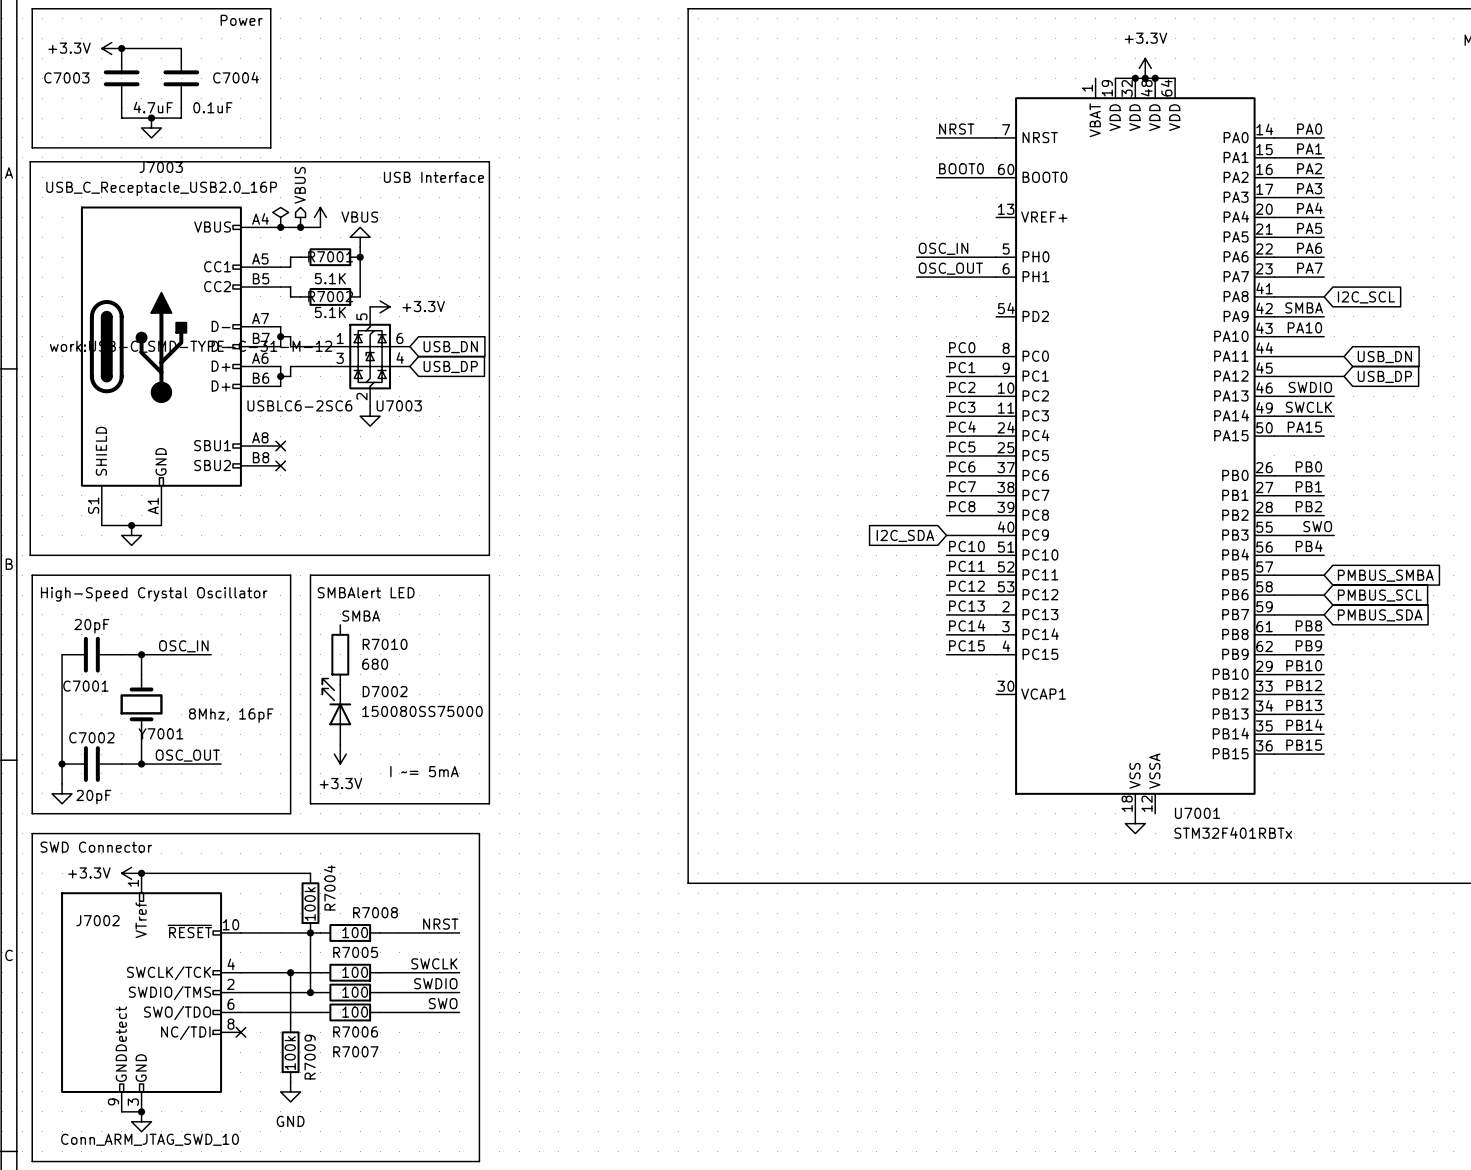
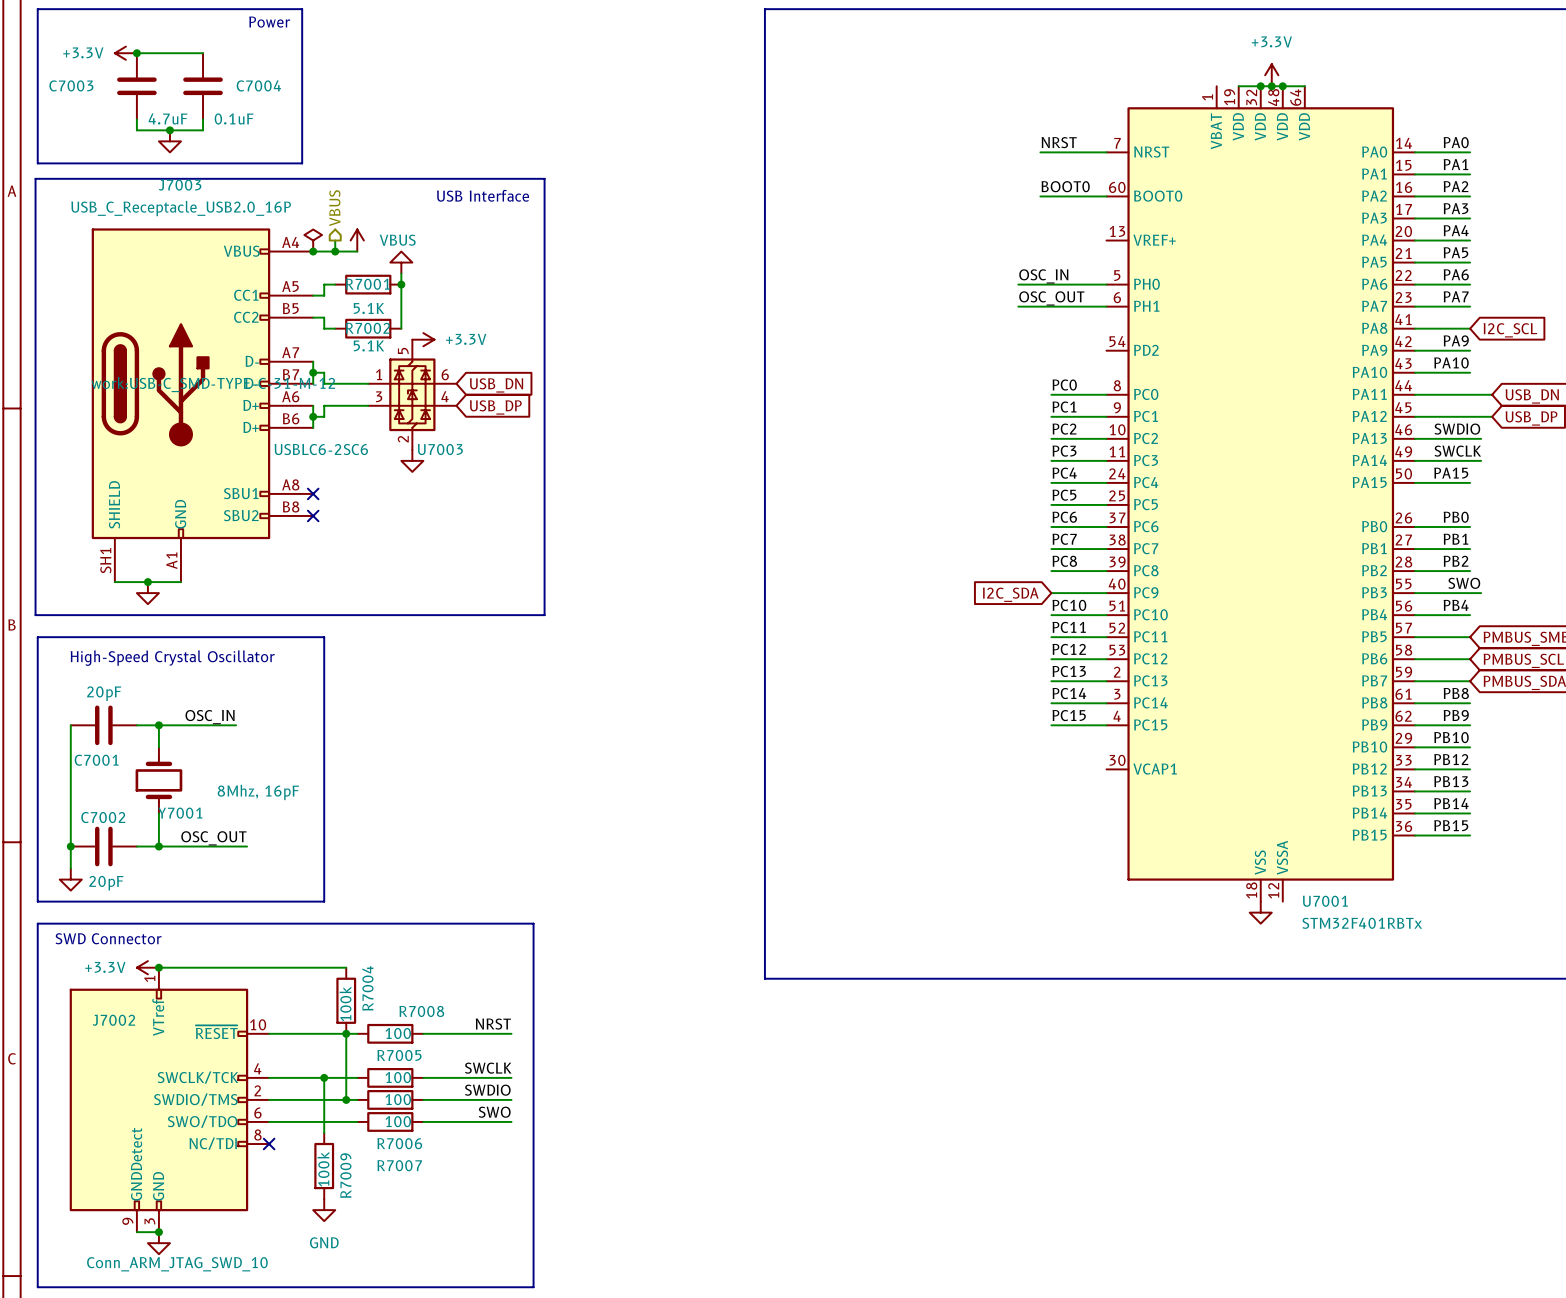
label: SMBA (1304, 307) -> PA9 (1456, 340)
J7003 pin number: S1 (93, 505) -> SH1 (105, 560)
line: (310, 575) (489, 575) (489, 803) (310, 803) (310, 575) -> none
text: SMBAlert LED (366, 592) -> none
label: SMBA (361, 616) -> none
R7010: 680 (340, 654) -> none
D7002: 150080SS75000 (336, 711) -> none
power symbol: +3.3V (340, 754) -> none
text: I ~= 5mA (424, 771) -> none

